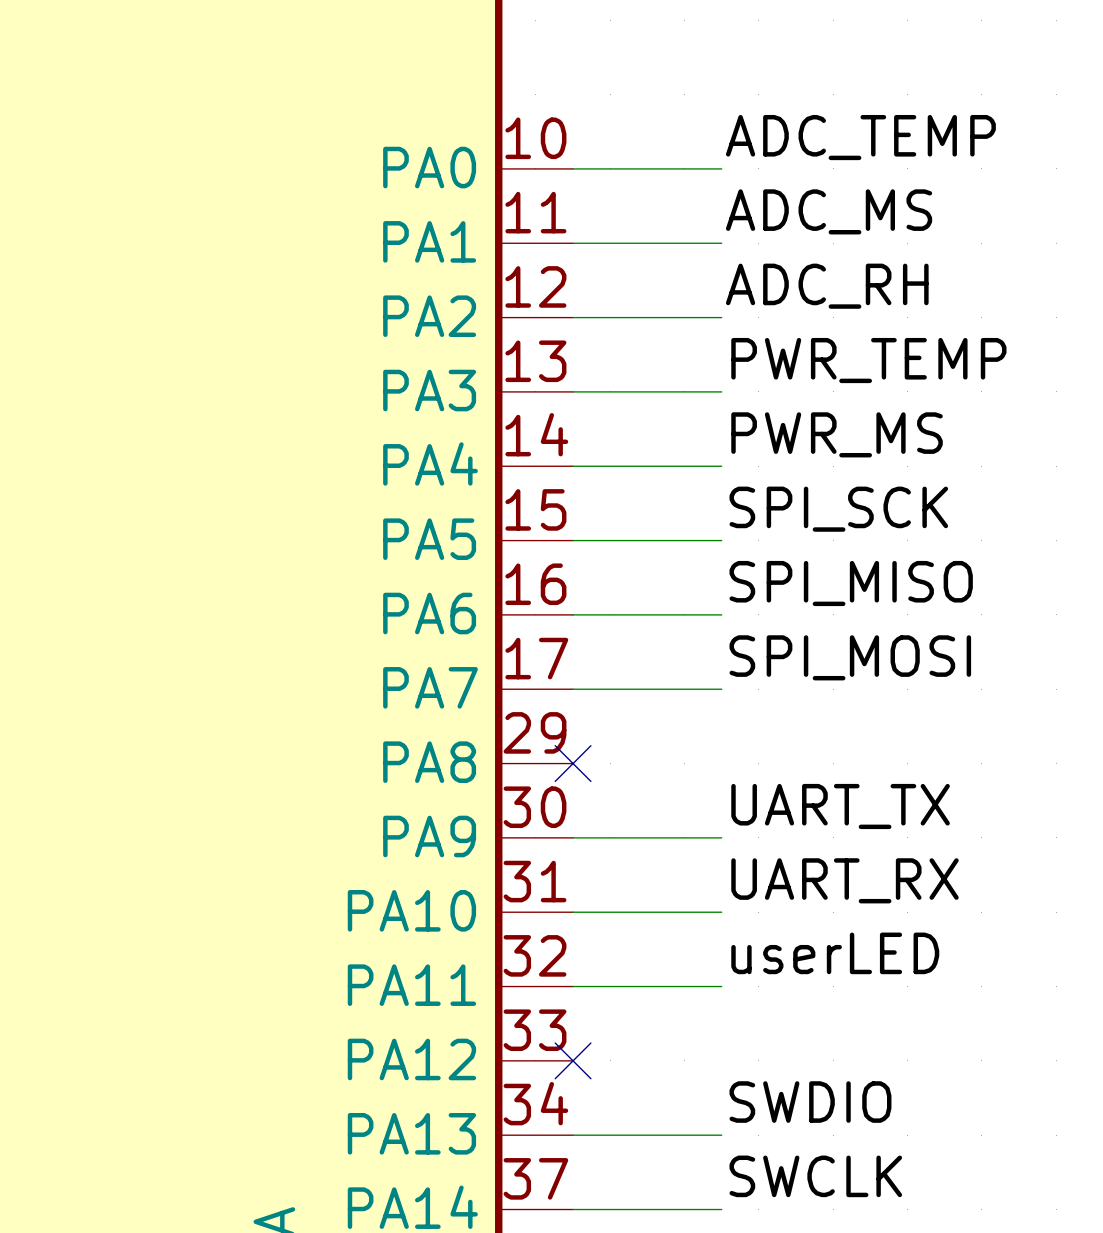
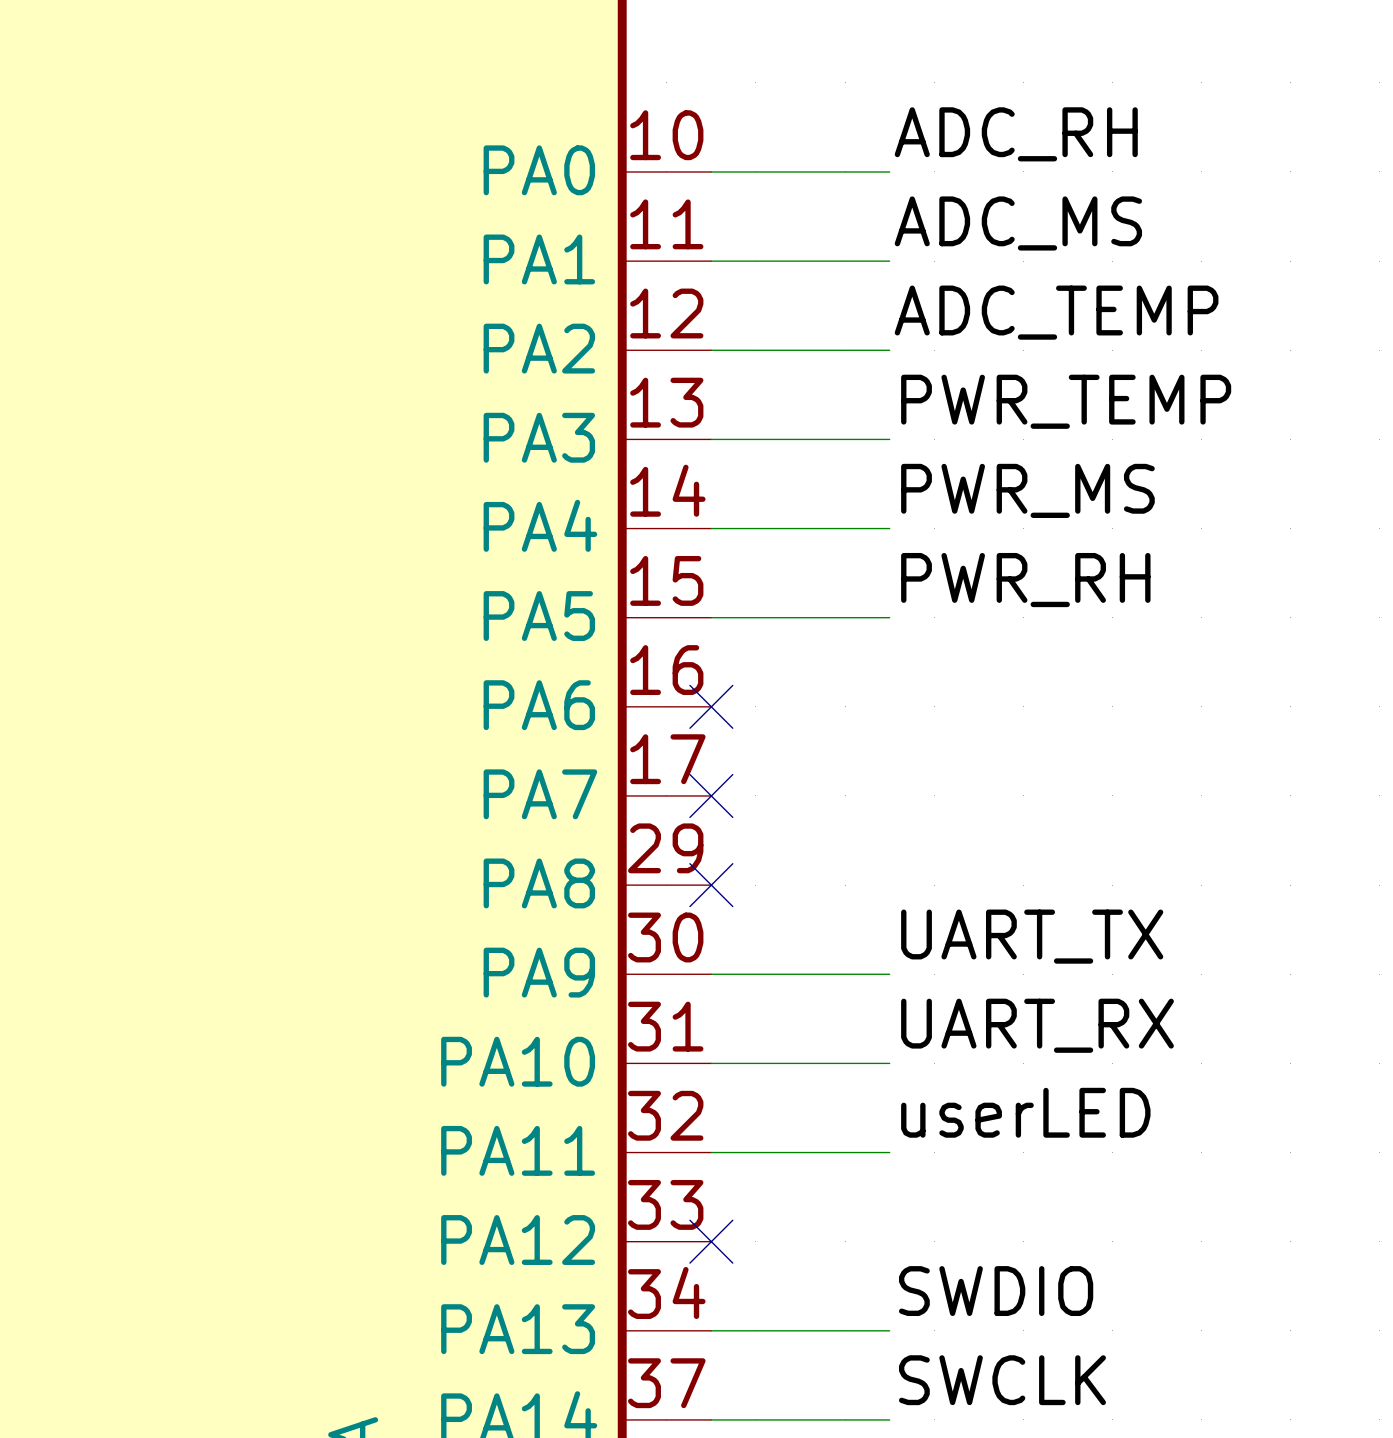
label: ADC_TEMP (860, 137) -> ADC_RH (1016, 134)
label: ADC_RH (827, 286) -> ADC_TEMP (1056, 312)
label: SPI_SCK (838, 509) -> PWR_RH (1025, 580)
label: SPI_MISO (851, 583) -> none
wire: (573, 614) (721, 614) -> none
no-connect mark: none -> (711, 706)
label: SPI_MOSI (850, 657) -> none
wire: (573, 689) (721, 689) -> none
no-connect mark: none -> (711, 795)

